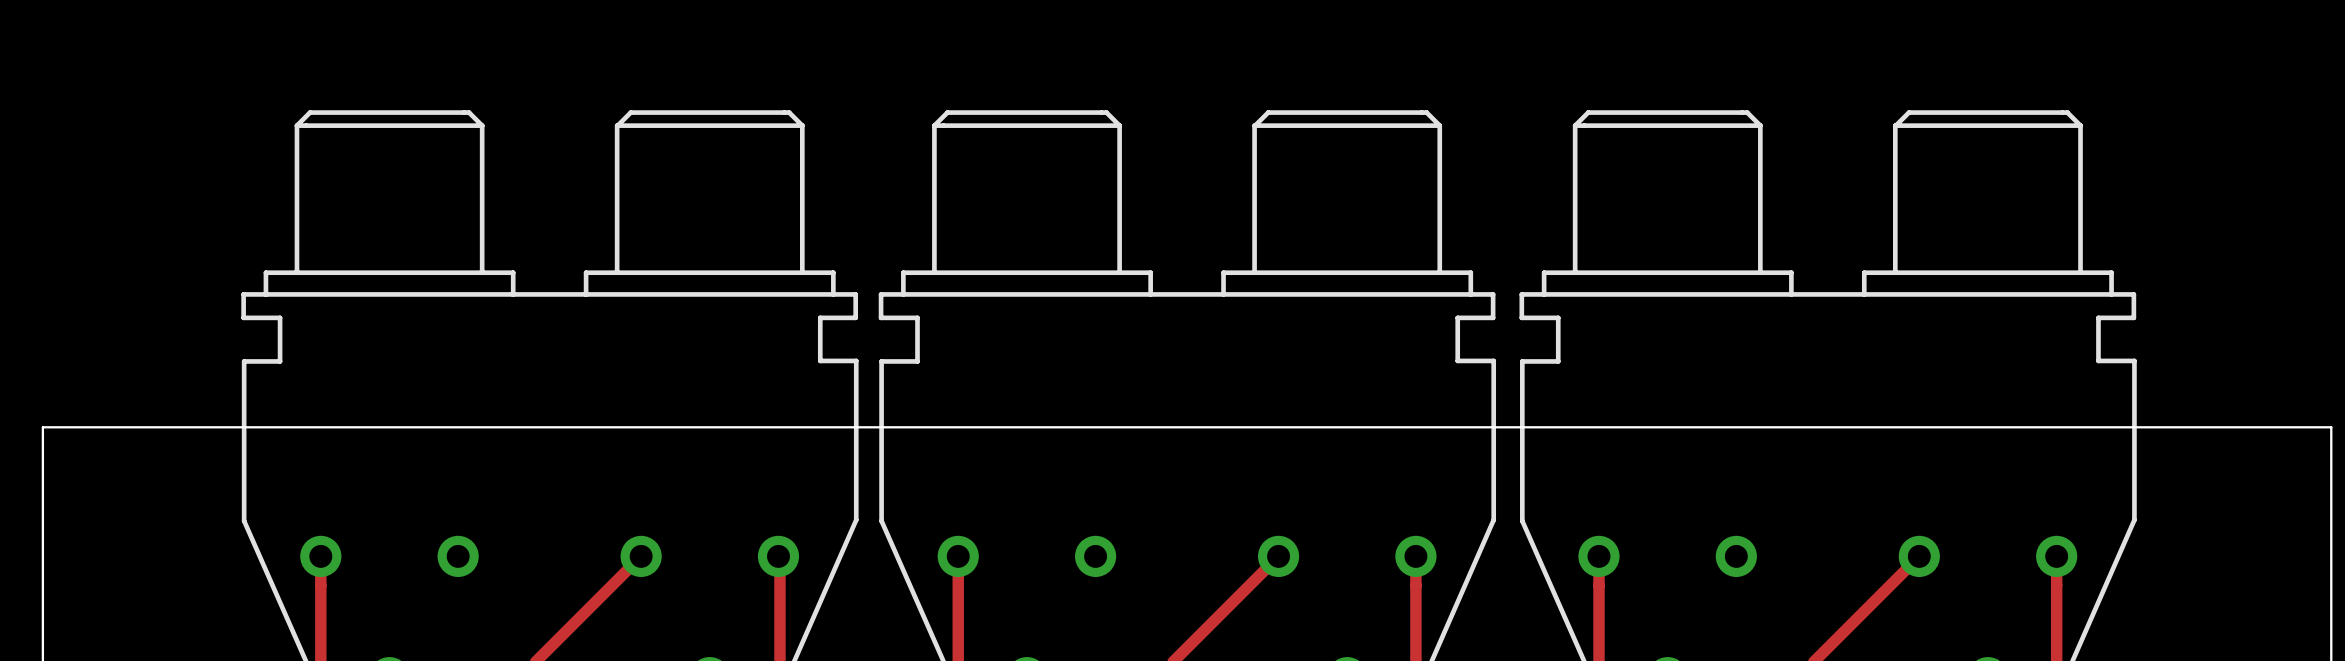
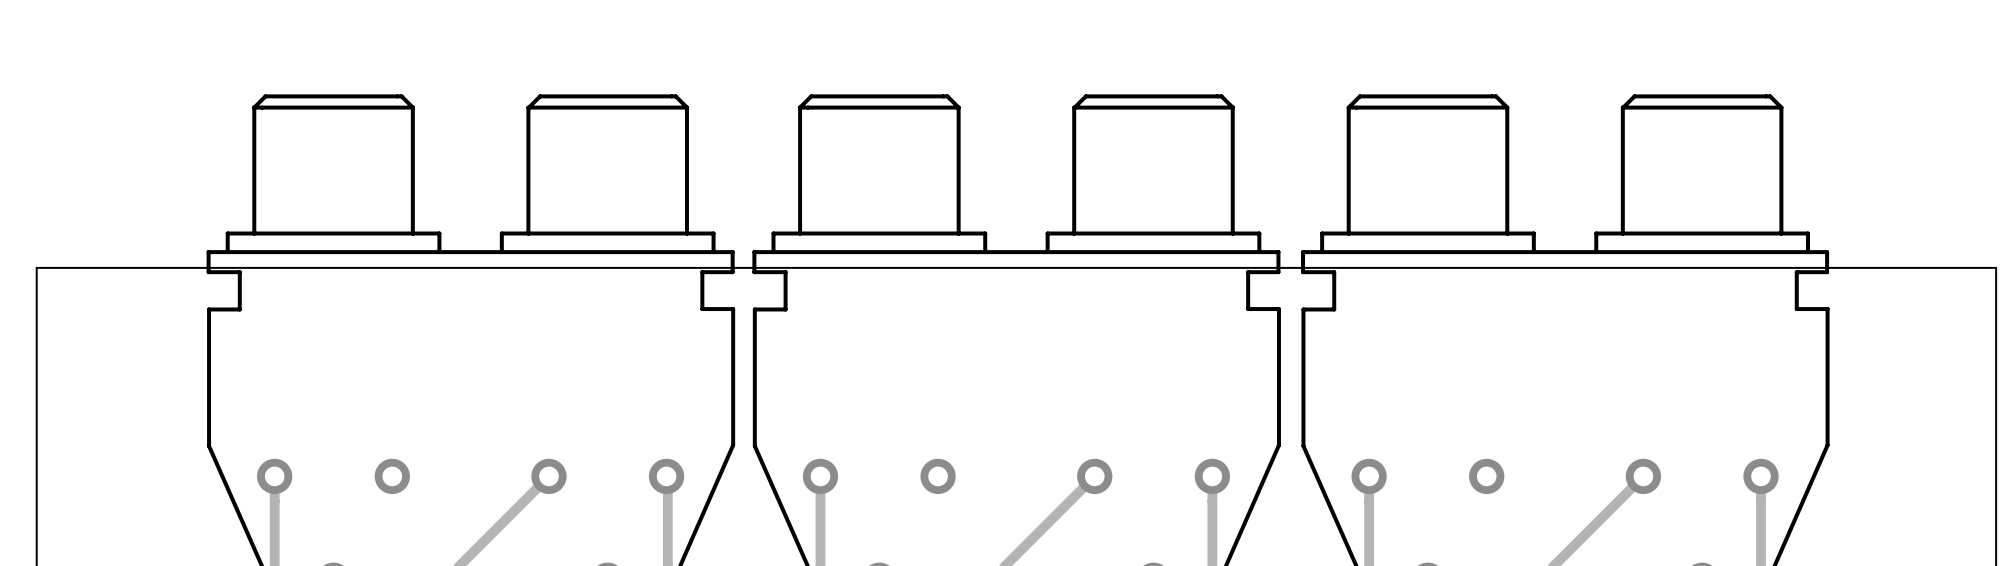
board edge: (42, 427) (2331, 427) -> (36, 365) (36, 267) (1996, 267) (1996, 365)

